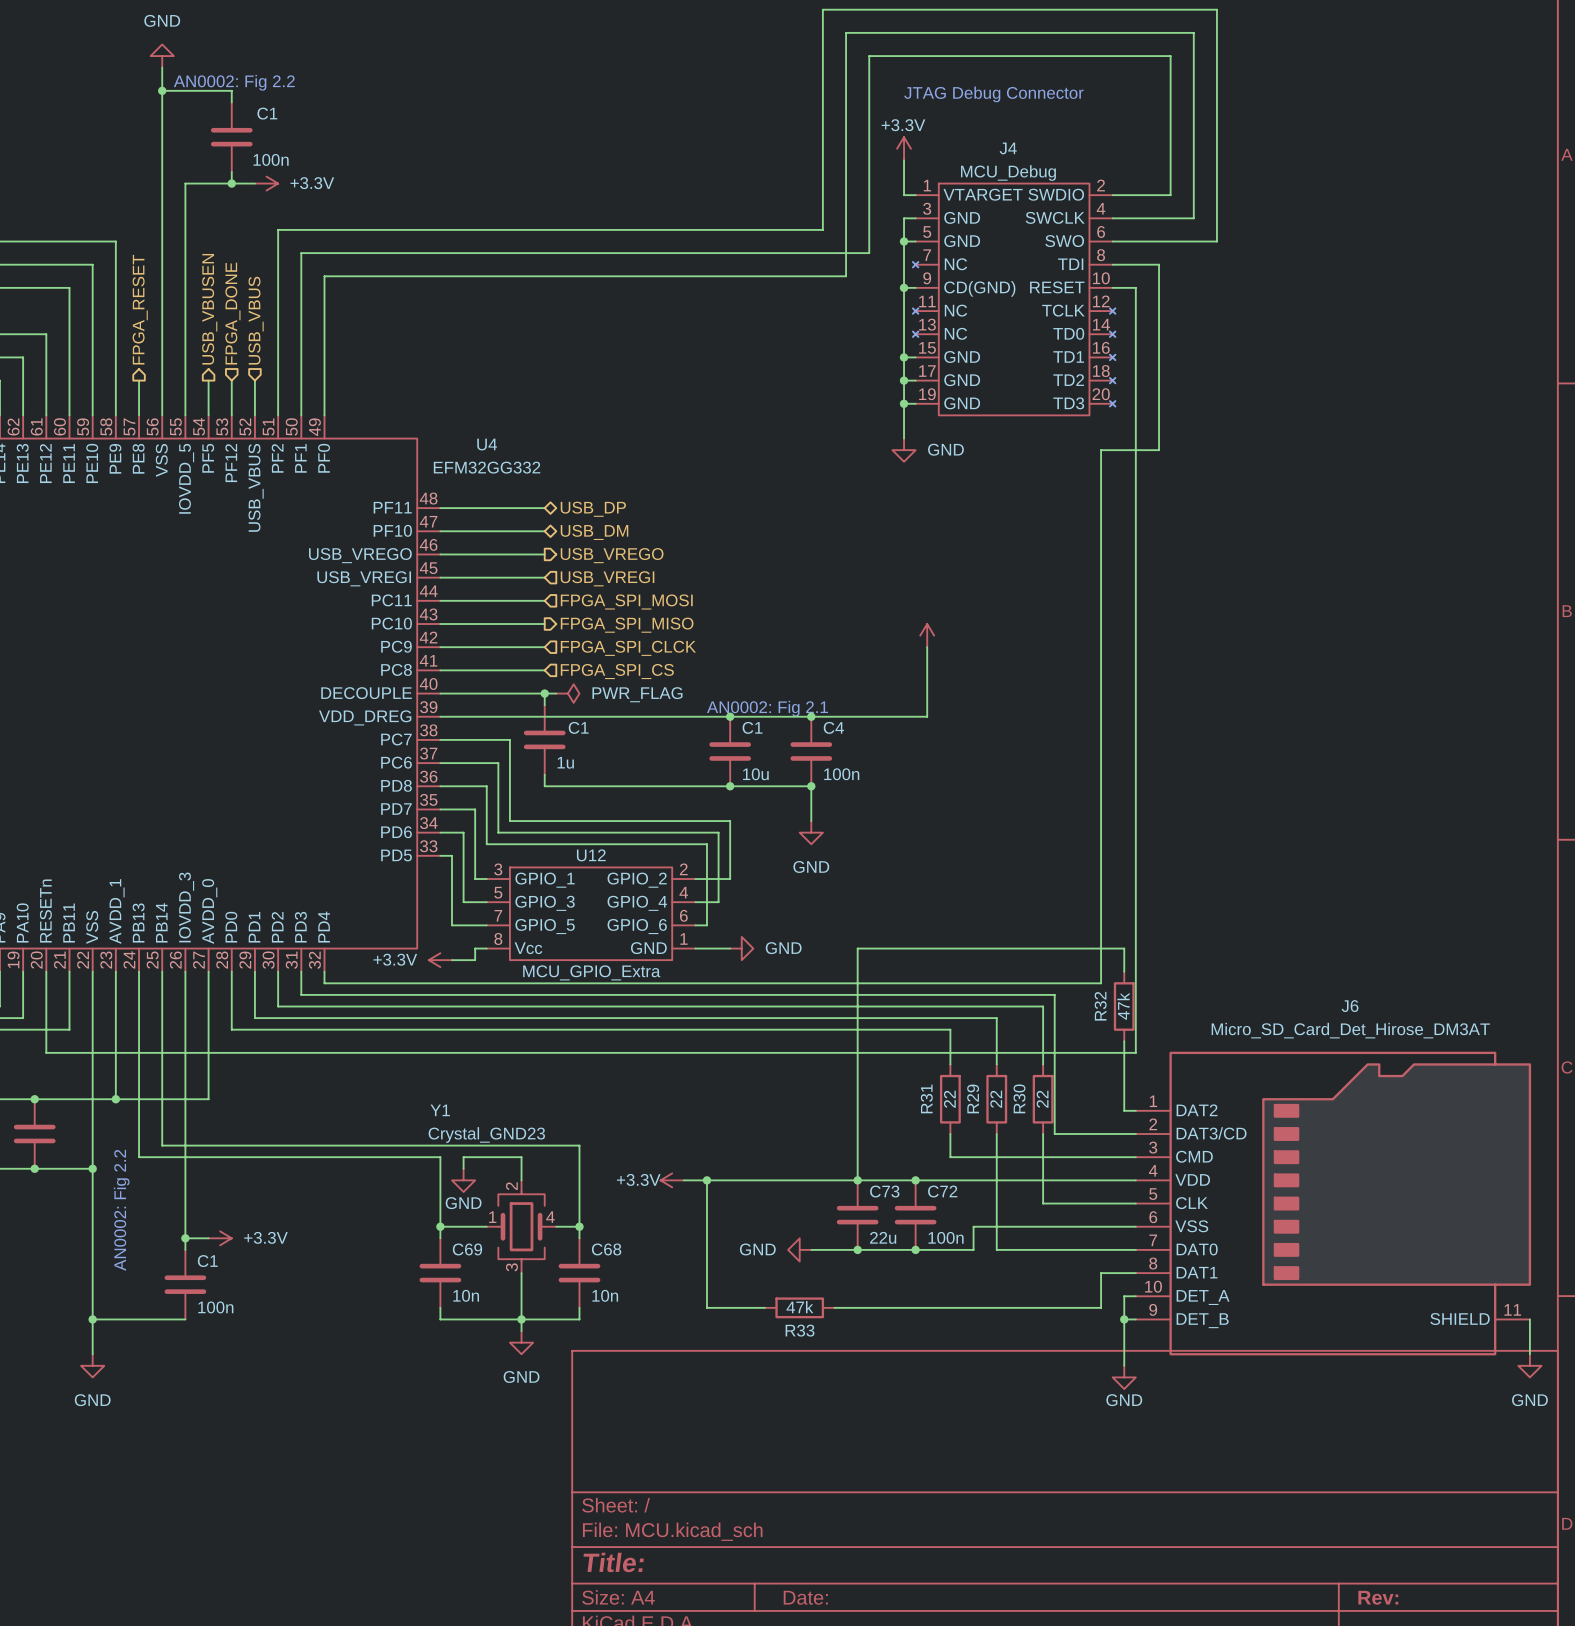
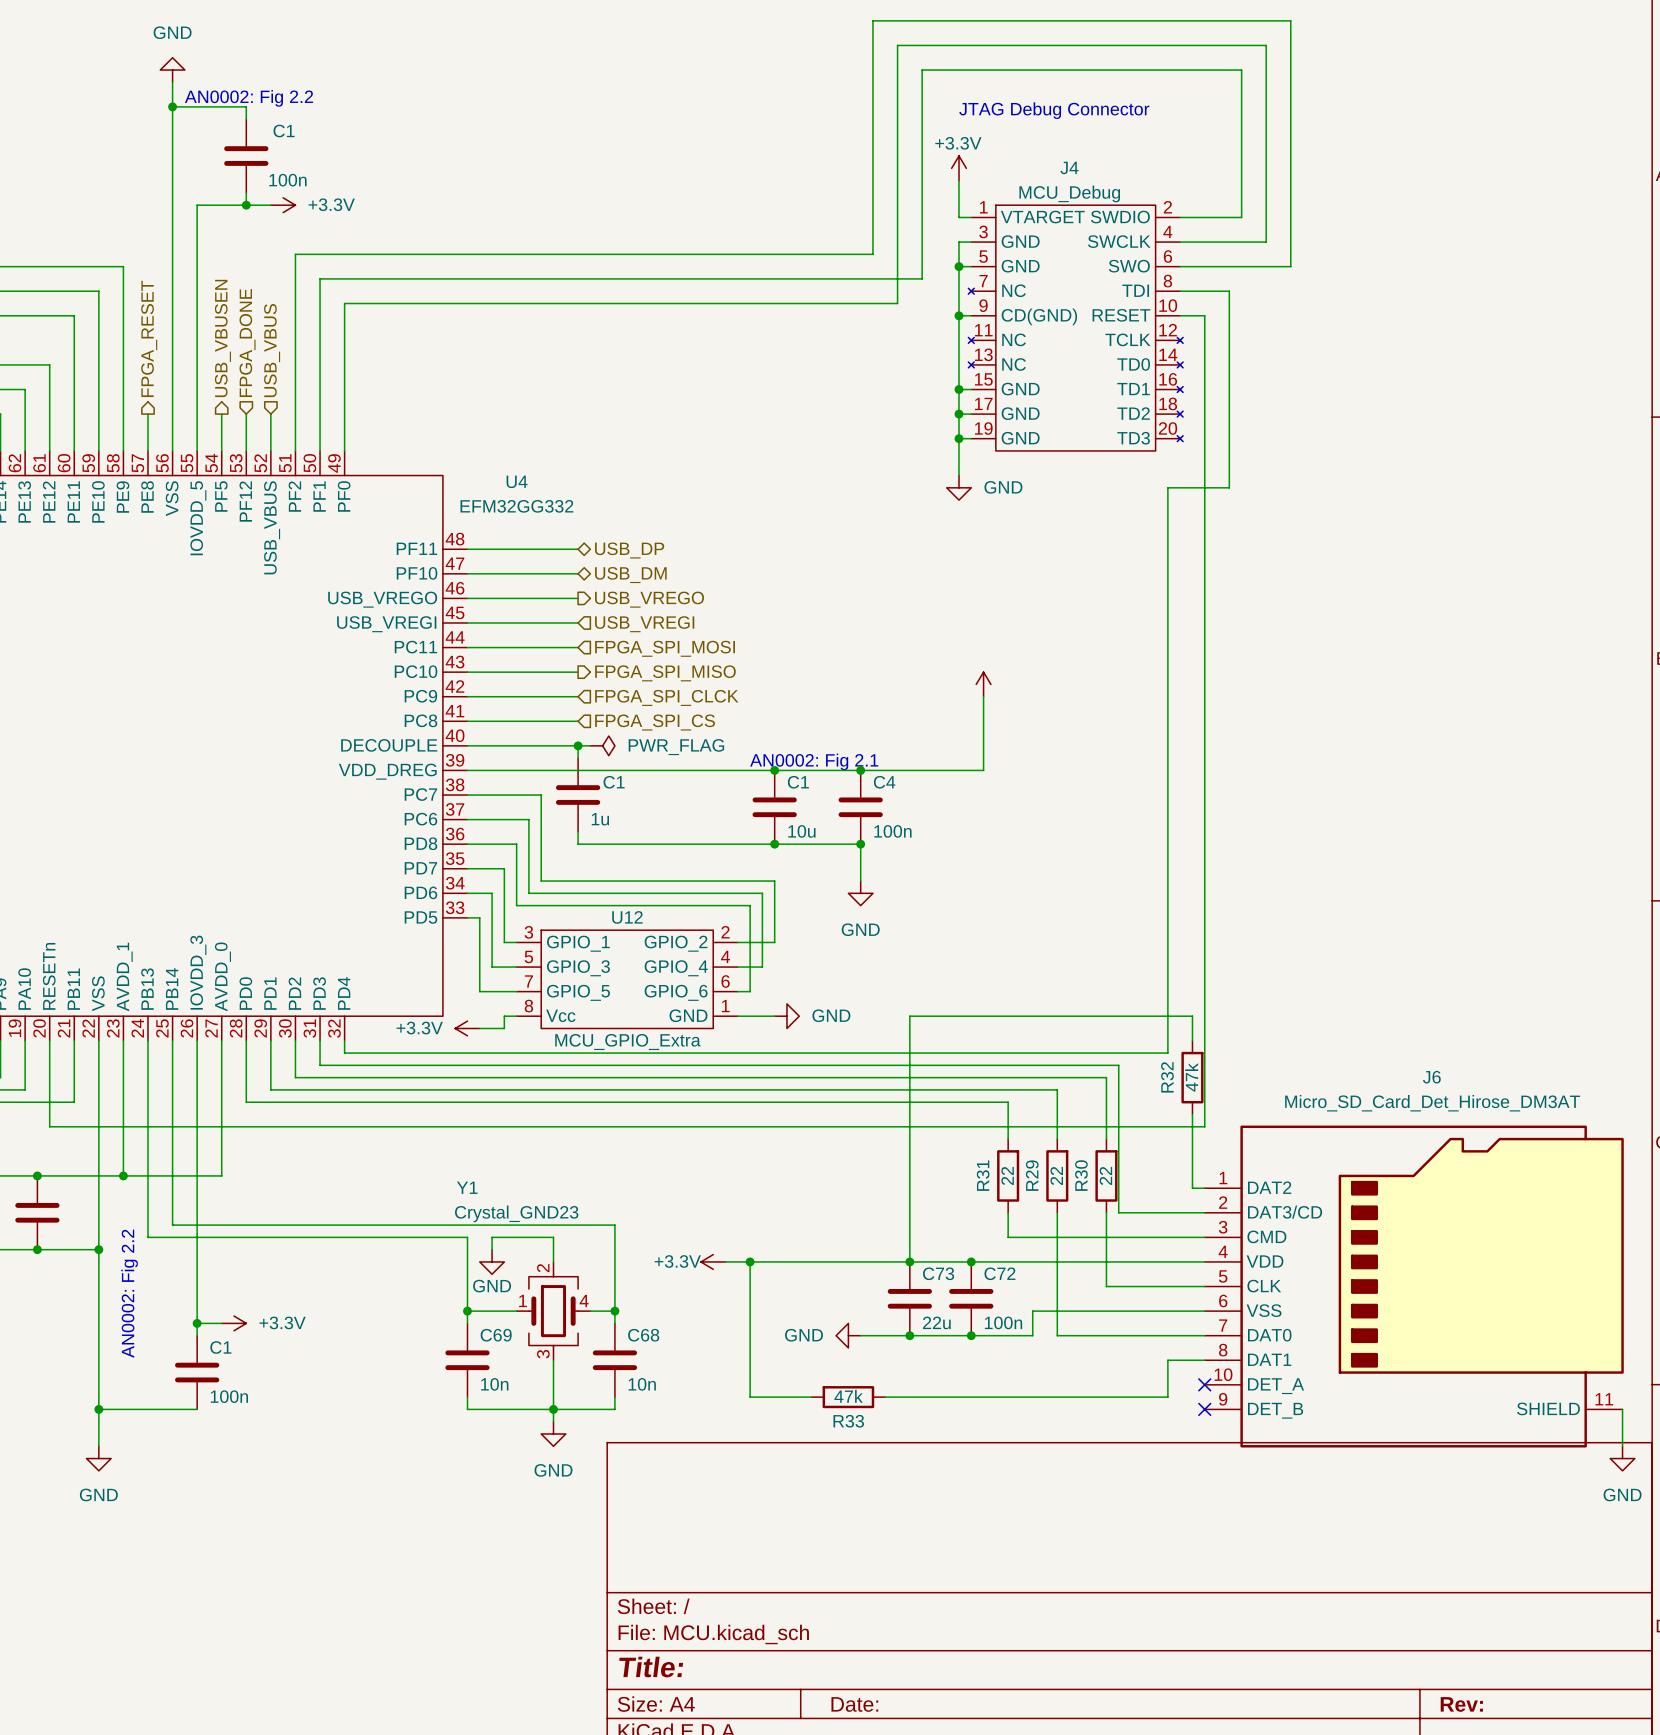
wire: (1135, 1296) (1124, 1296) (1124, 1365) -> none
no-connect mark: none -> (1204, 1384)
wire: (1124, 1319) (1135, 1319) -> none
junction: (1124, 1319) -> none
no-connect mark: none -> (1204, 1409)
power symbol: GND (1124, 1377) -> none

